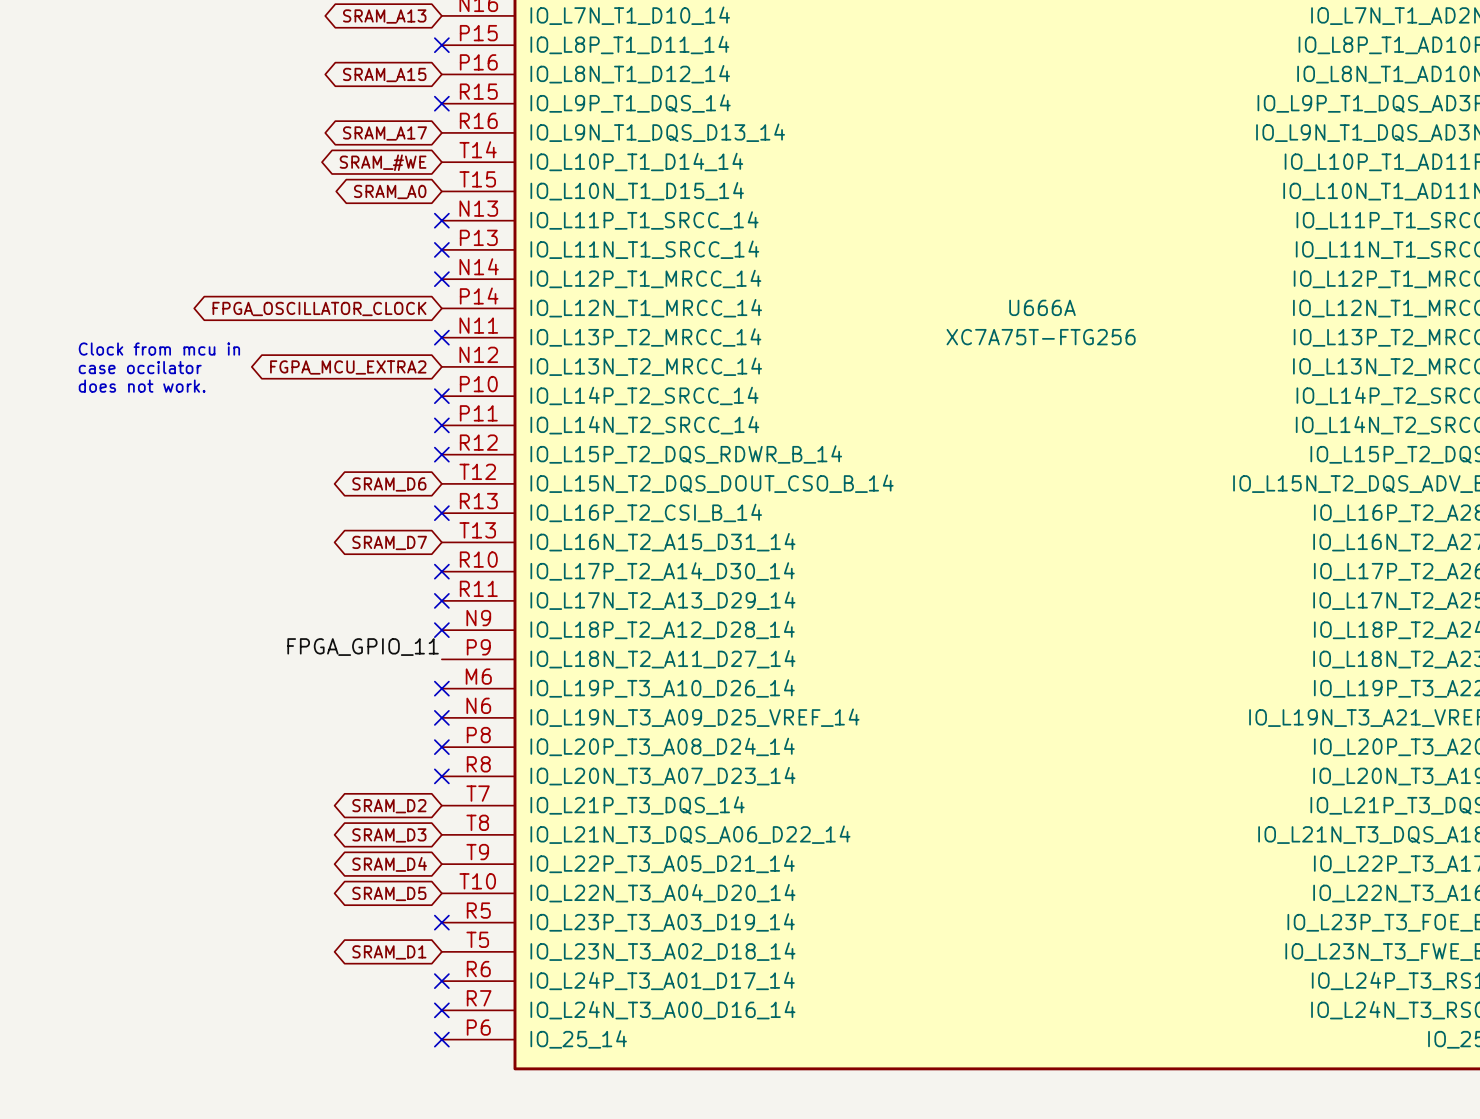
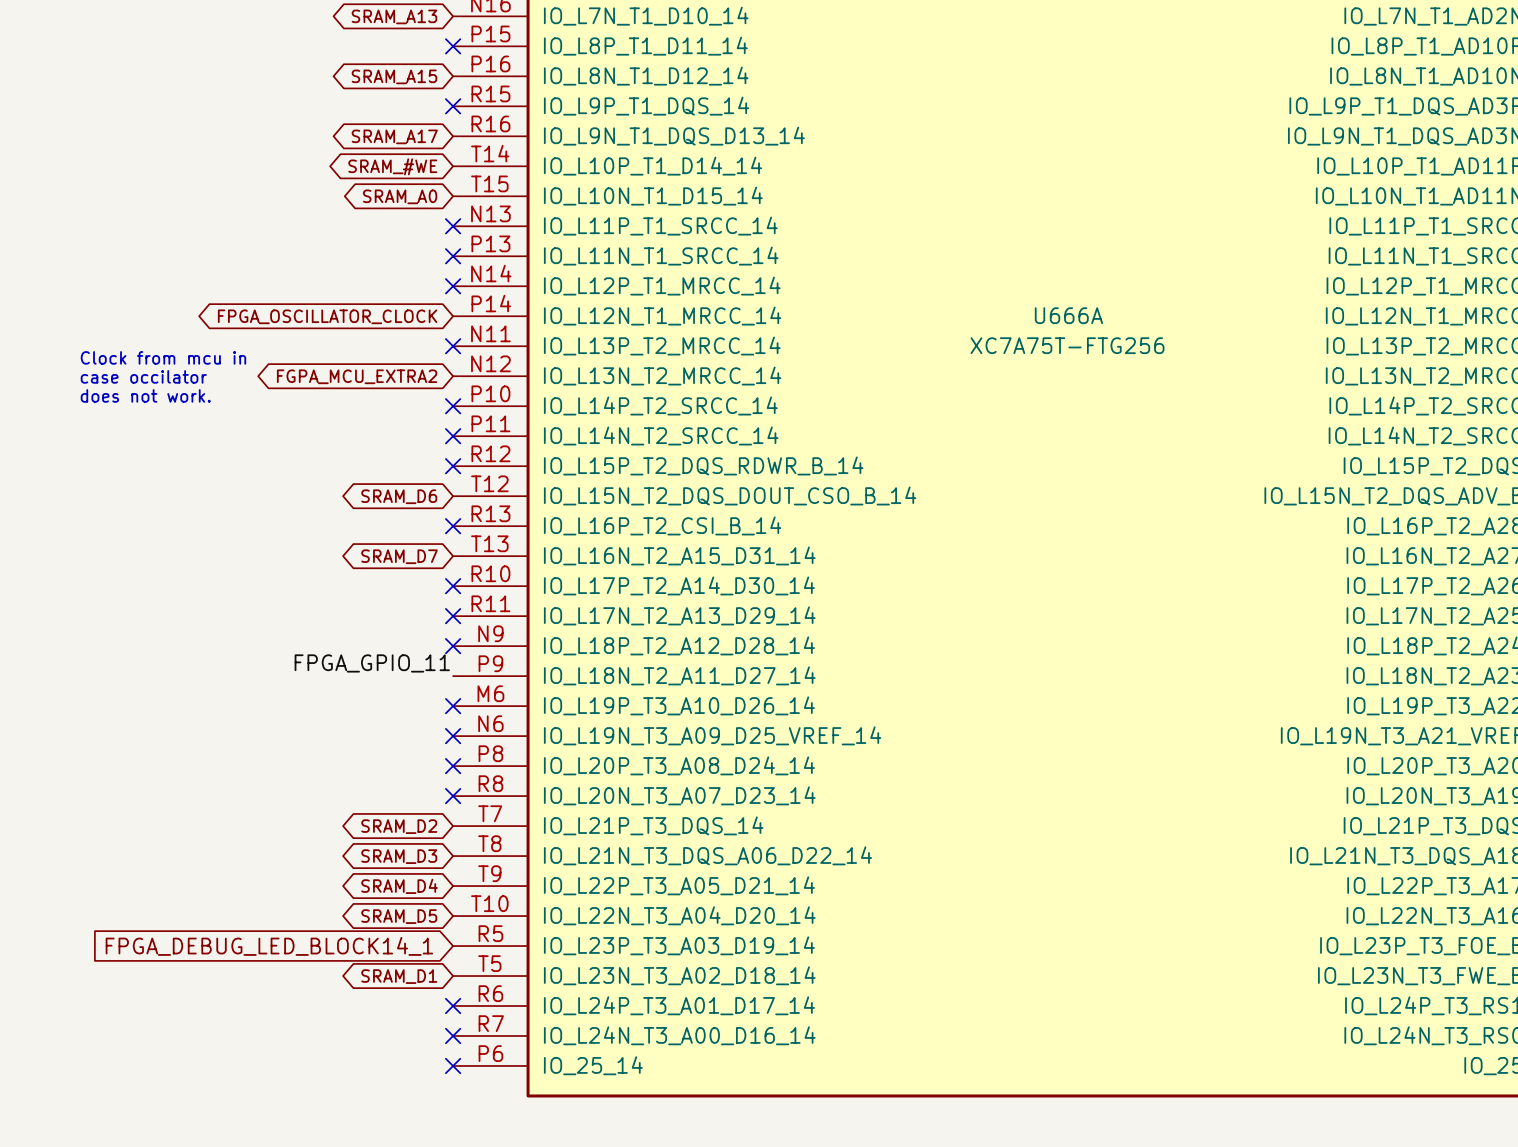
global label: none -> FPGA_DEBUG_LED_BLOCK14_1 (269, 946)
no-connect mark: (441, 922) -> none

